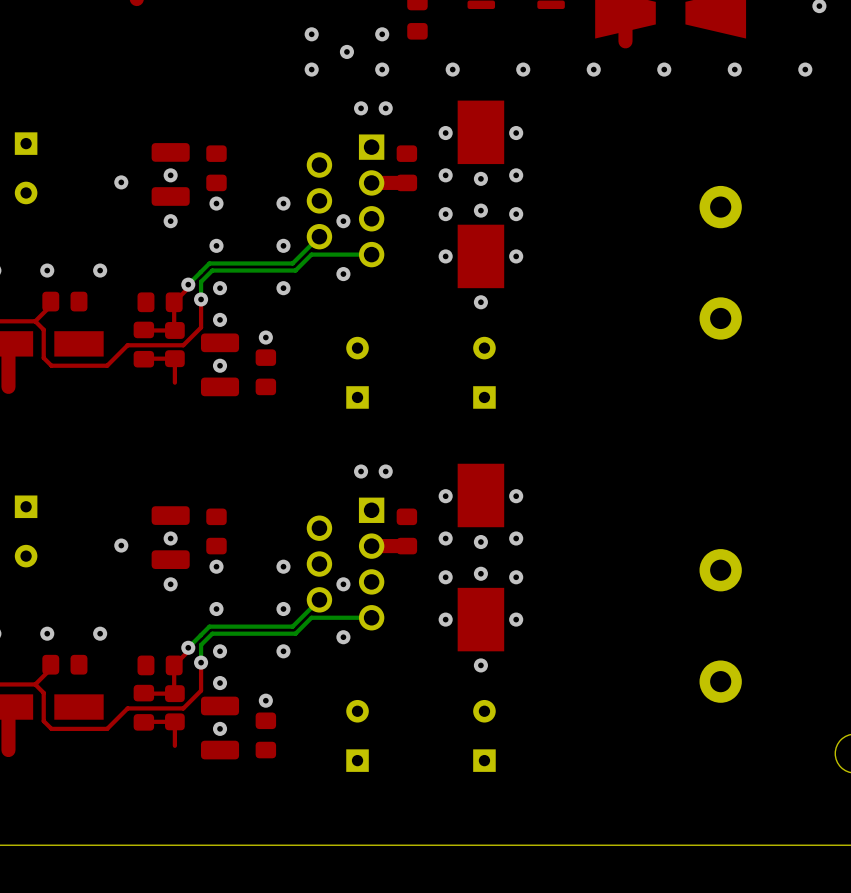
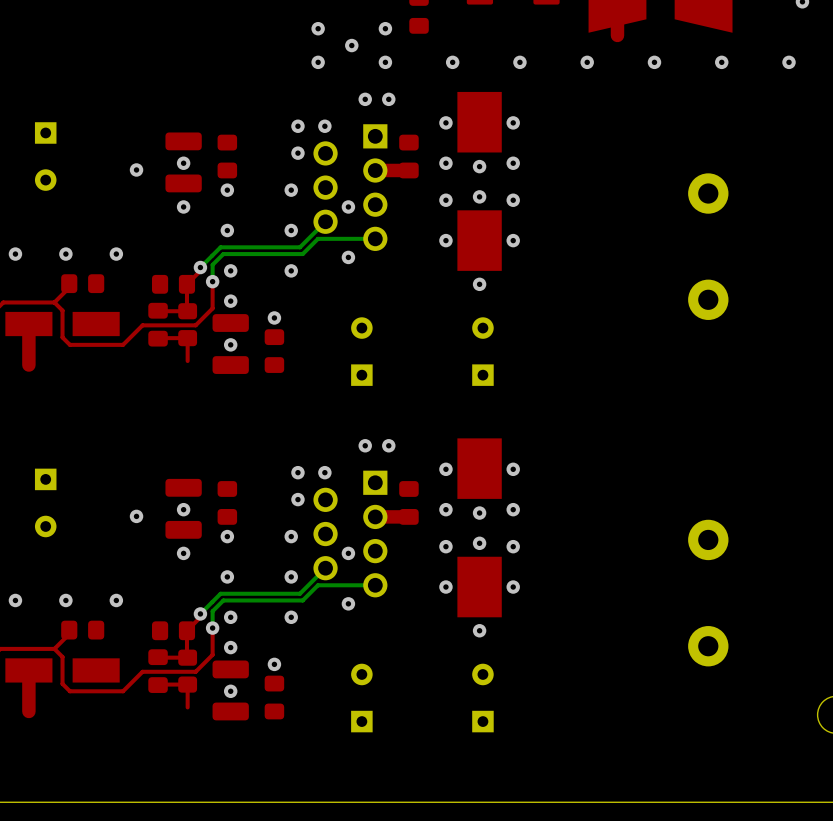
via: none -> (297, 126)
via: none -> (324, 126)
via: none -> (297, 153)
via: none -> (297, 472)
via: none -> (324, 472)
via: none -> (297, 499)

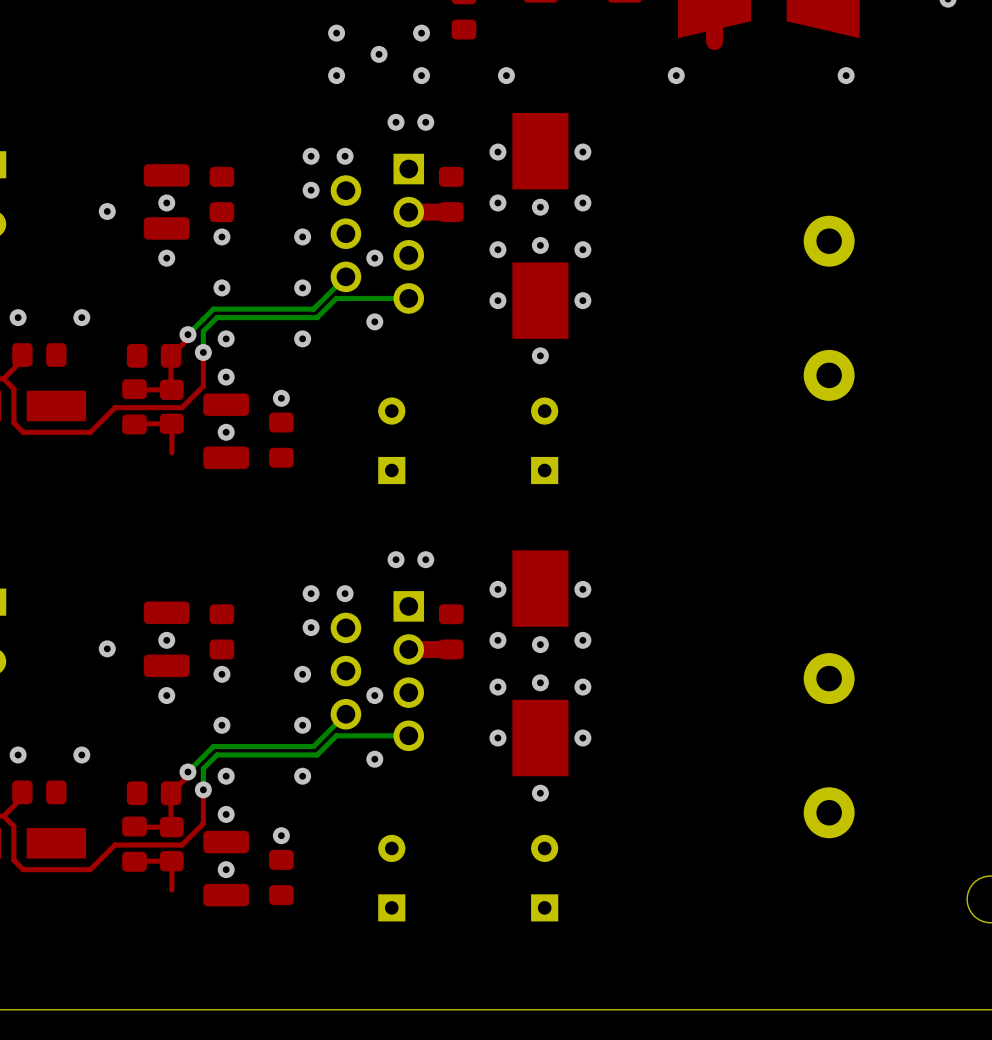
via: (519, 62) -> none
via: (654, 62) -> none
via: (789, 62) -> none

